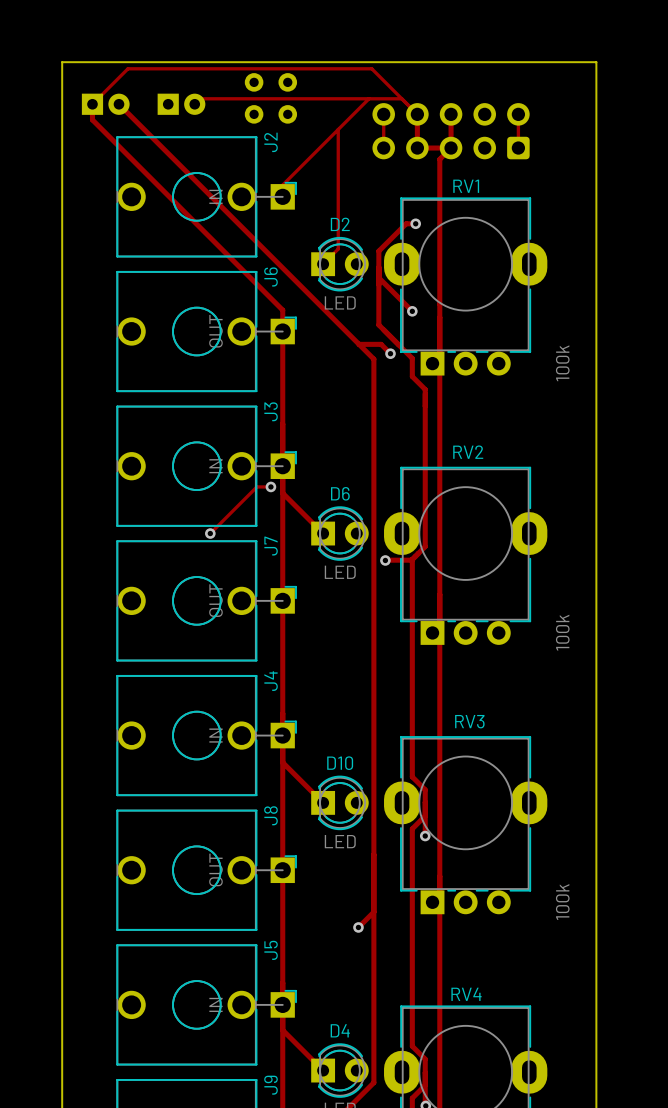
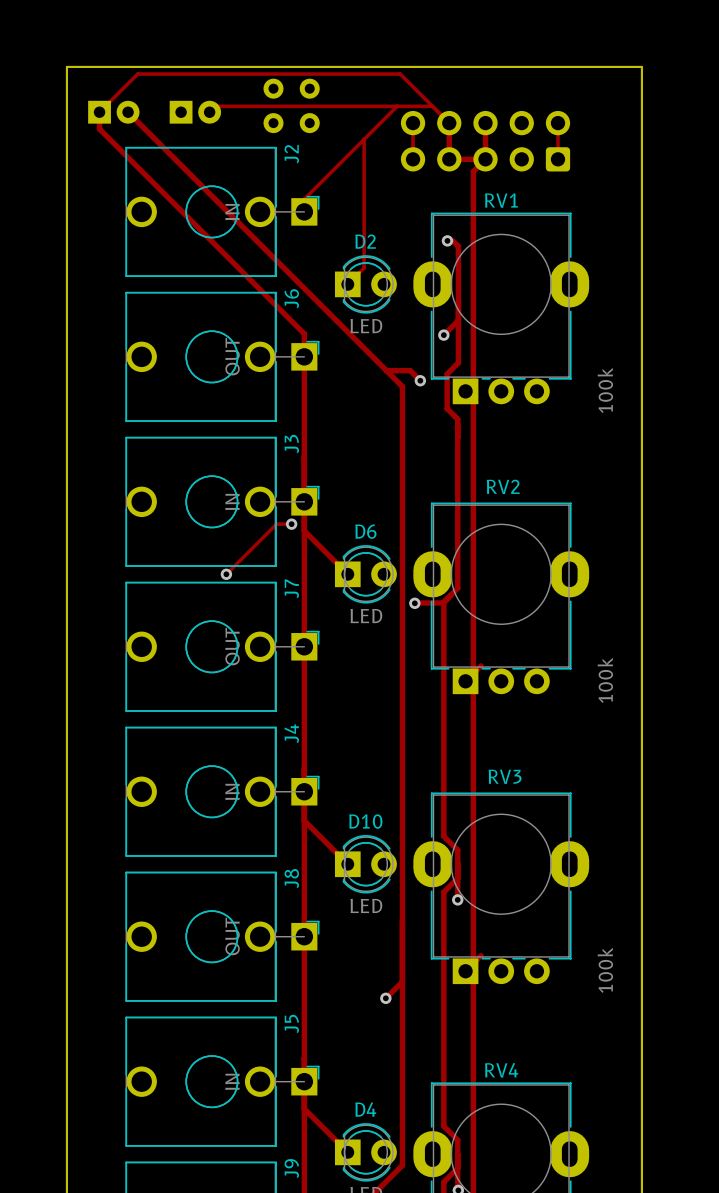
track: (415, 223) (406, 223) (378, 251) (378, 324) (412, 358) (412, 376) (415, 379) -> (452, 240) (458, 246) (458, 362) (447, 374) (447, 408)
track: (378, 277) (412, 311) -> (458, 320) (443, 335)
track: none -> (481, 665) (473, 673)
track: none -> (481, 955) (473, 963)

